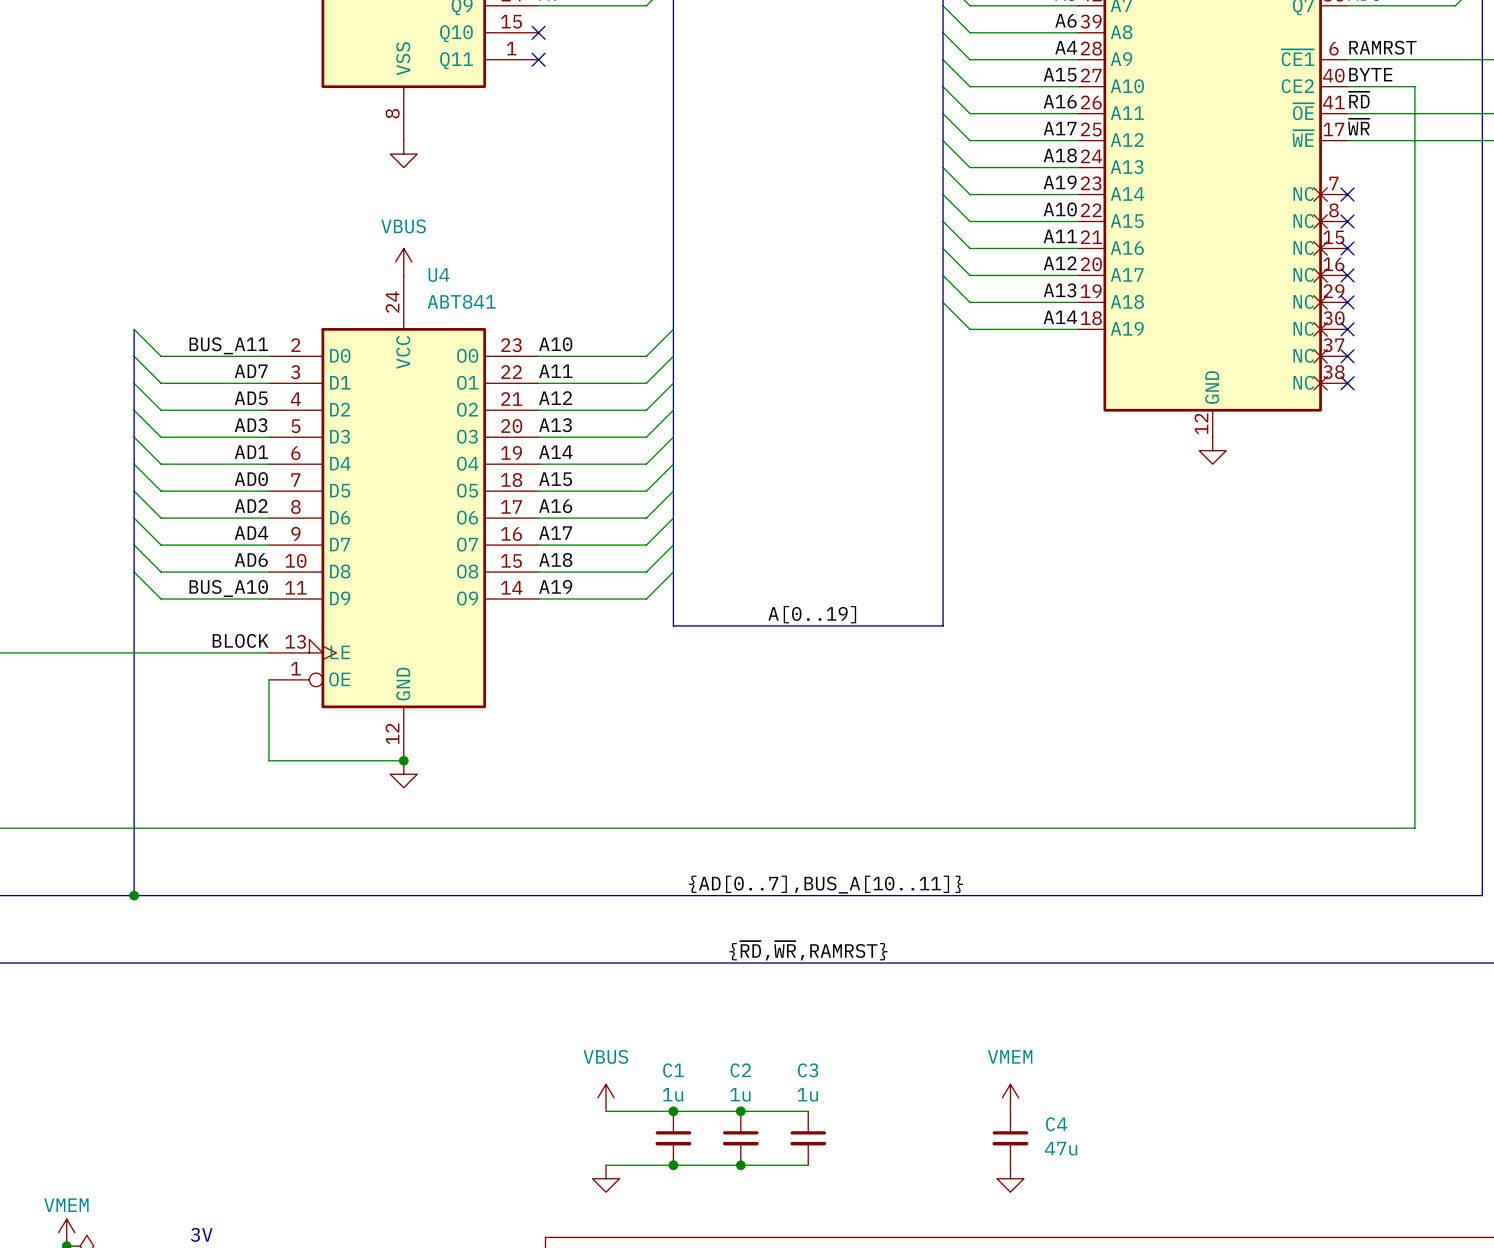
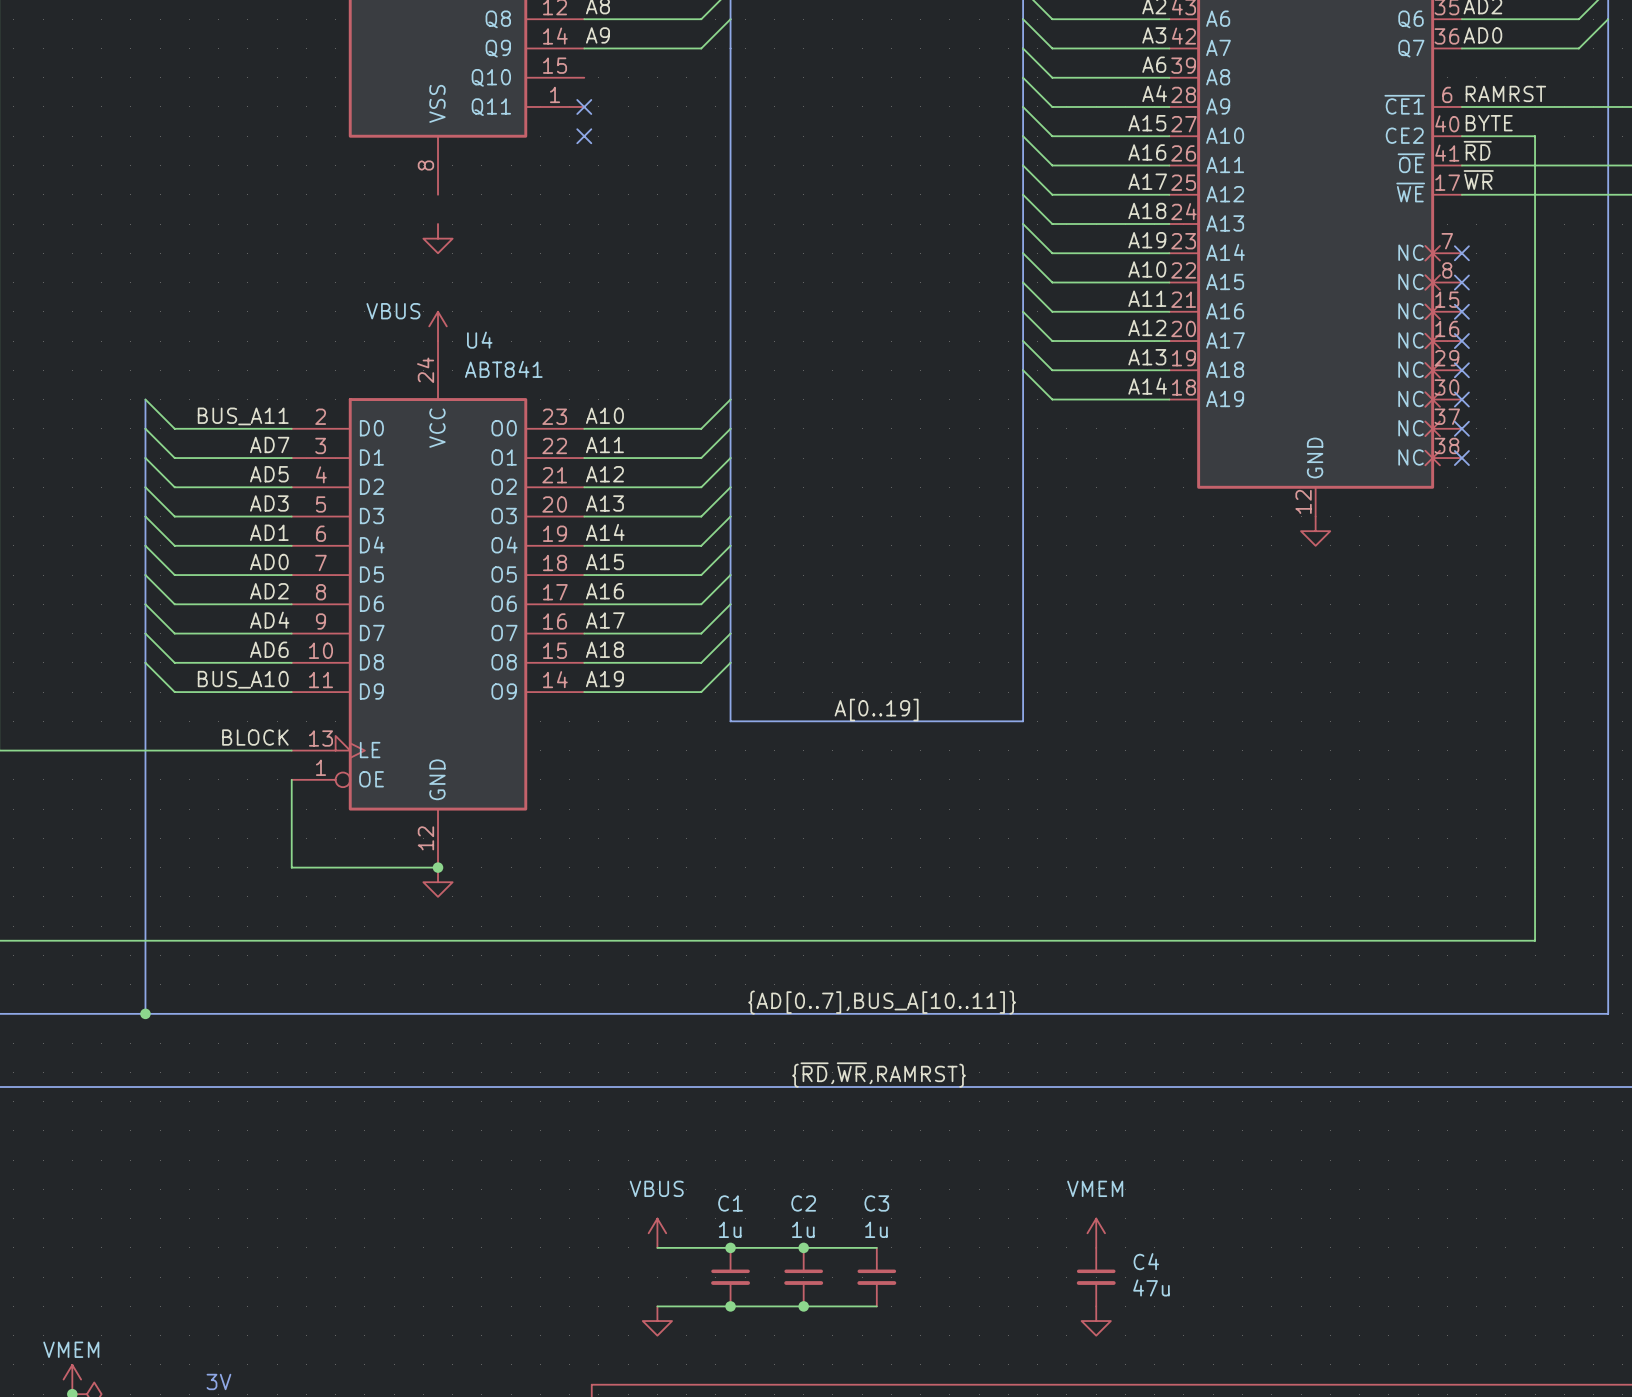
no-connect mark position: (538, 32) -> (584, 136)
power symbol position: (403, 154) -> (438, 238)
power symbol text position: VBUS (403, 226) -> VBUS (393, 311)

